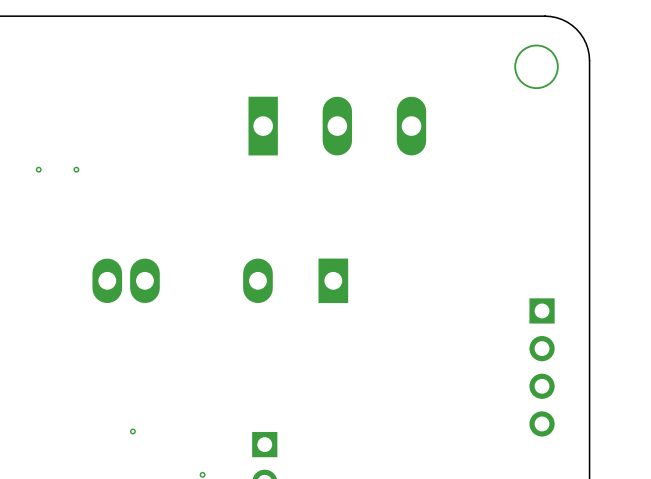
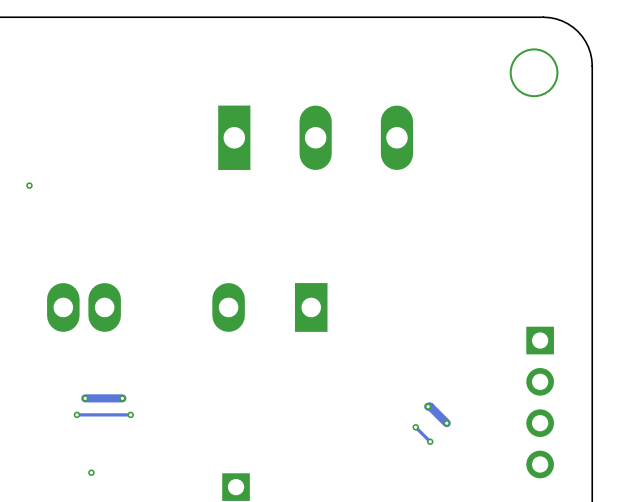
via: none -> (85, 398)
track: none -> (122, 398) (85, 398)
via: none -> (122, 398)
track: none -> (428, 406) (446, 423)
via: none -> (428, 406)
via: none -> (76, 414)
track: none -> (130, 414) (76, 414)
via: none -> (130, 414)
via: none -> (446, 423)
track: none -> (415, 427) (430, 441)
via: none -> (415, 427)
via: none -> (430, 441)

